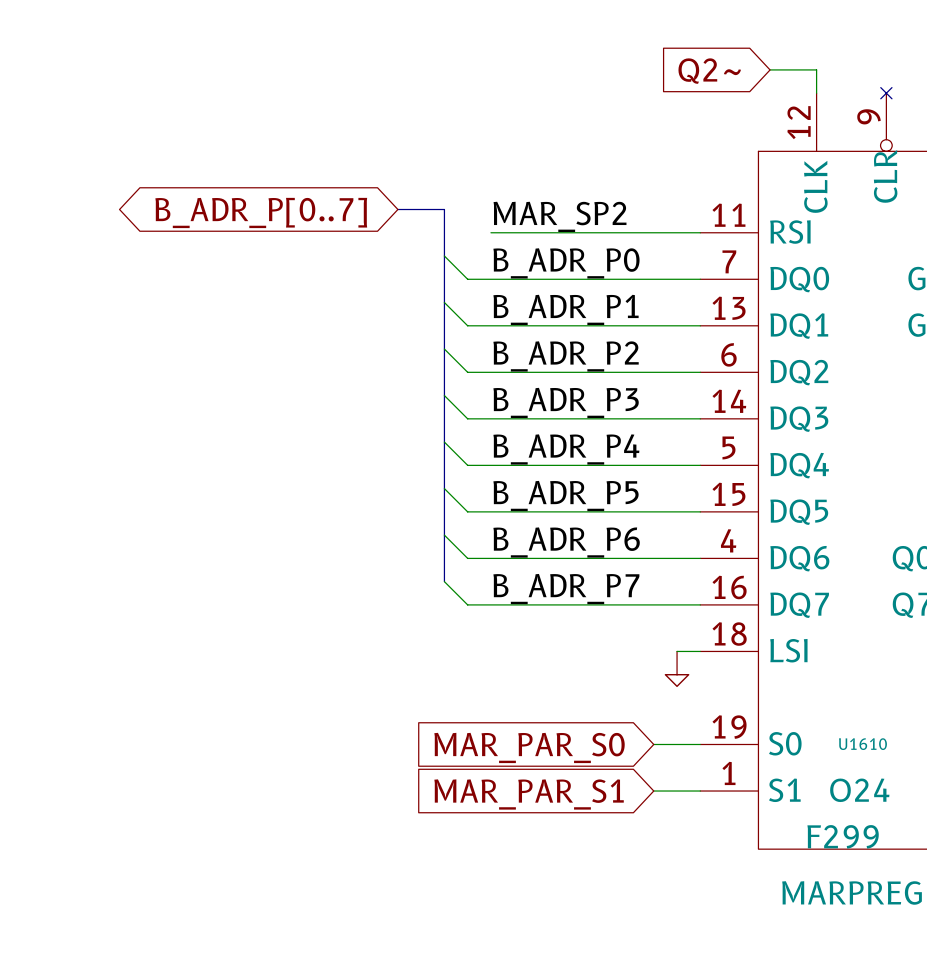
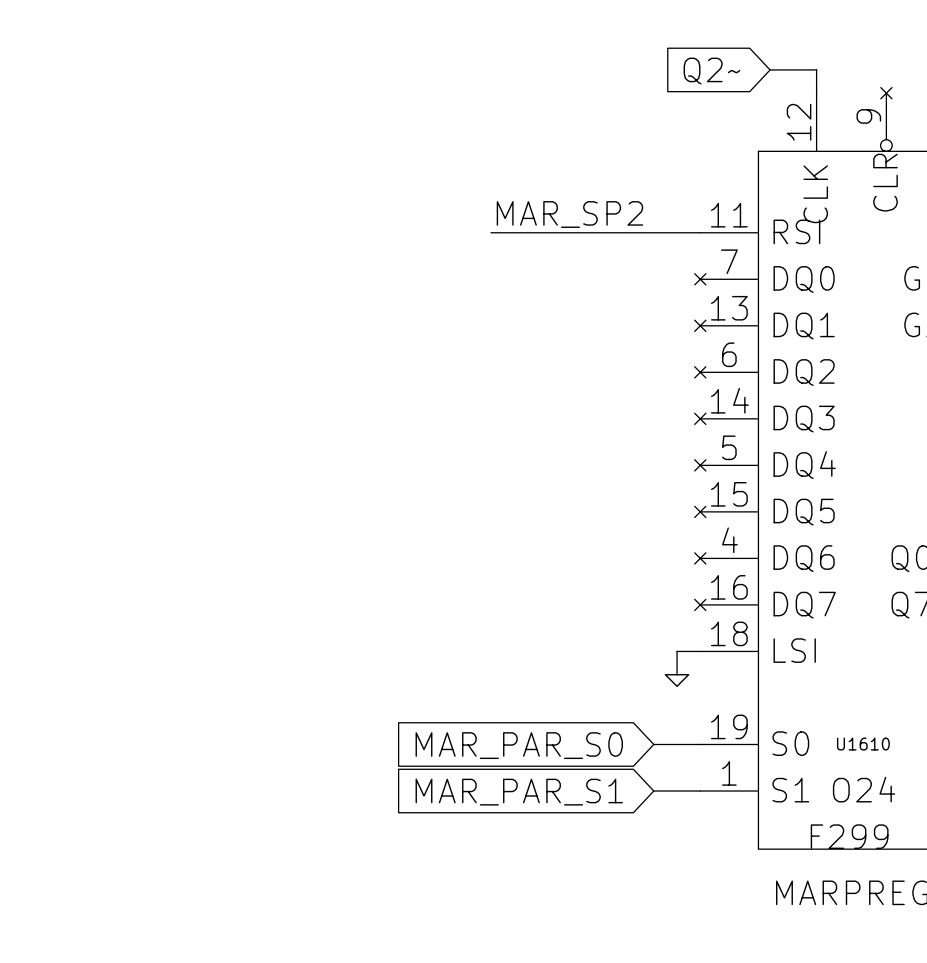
bus: (397, 209) (444, 209) (444, 581) -> none
global label: B_ADR_P[0..7] (261, 212) -> none
wire: (444, 256) (467, 279) (700, 279) -> none
label: B_ADR_P0 (566, 263) -> none
no-connect mark: none -> (700, 279)
wire: (444, 302) (467, 325) (700, 325) -> none
label: B_ADR_P1 (566, 309) -> none
no-connect mark: none -> (700, 325)
wire: (444, 349) (467, 372) (700, 372) -> none
label: B_ADR_P2 (566, 356) -> none
no-connect mark: none -> (700, 372)
wire: (444, 395) (467, 418) (700, 418) -> none
label: B_ADR_P3 (566, 402) -> none
no-connect mark: none -> (700, 418)
wire: (444, 442) (467, 465) (700, 465) -> none
label: B_ADR_P4 (566, 449) -> none
no-connect mark: none -> (700, 465)
wire: (444, 488) (467, 511) (700, 511) -> none
label: B_ADR_P5 (566, 496) -> none
no-connect mark: none -> (700, 511)
wire: (444, 535) (467, 558) (700, 558) -> none
label: B_ADR_P6 (566, 542) -> none
no-connect mark: none -> (700, 558)
wire: (444, 581) (467, 604) (700, 604) -> none
label: B_ADR_P7 (566, 589) -> none
no-connect mark: none -> (700, 604)

